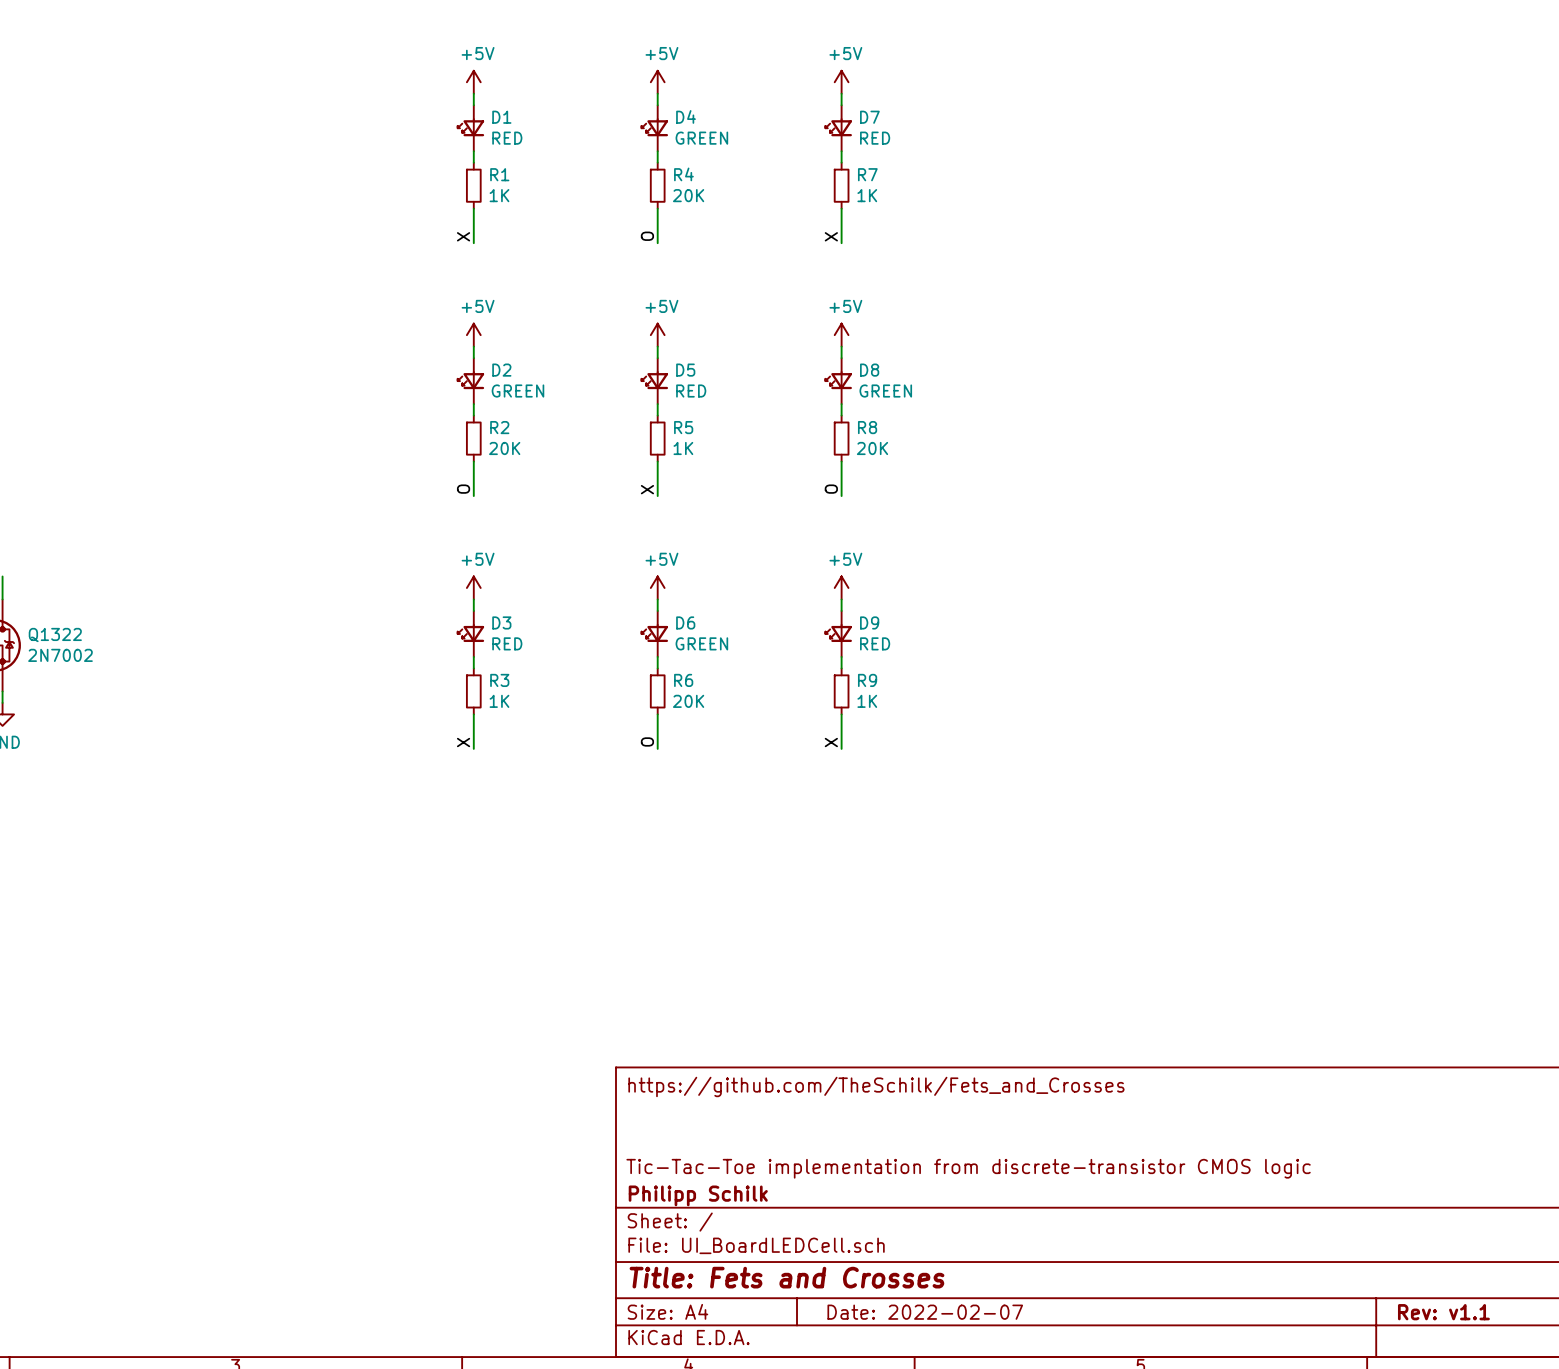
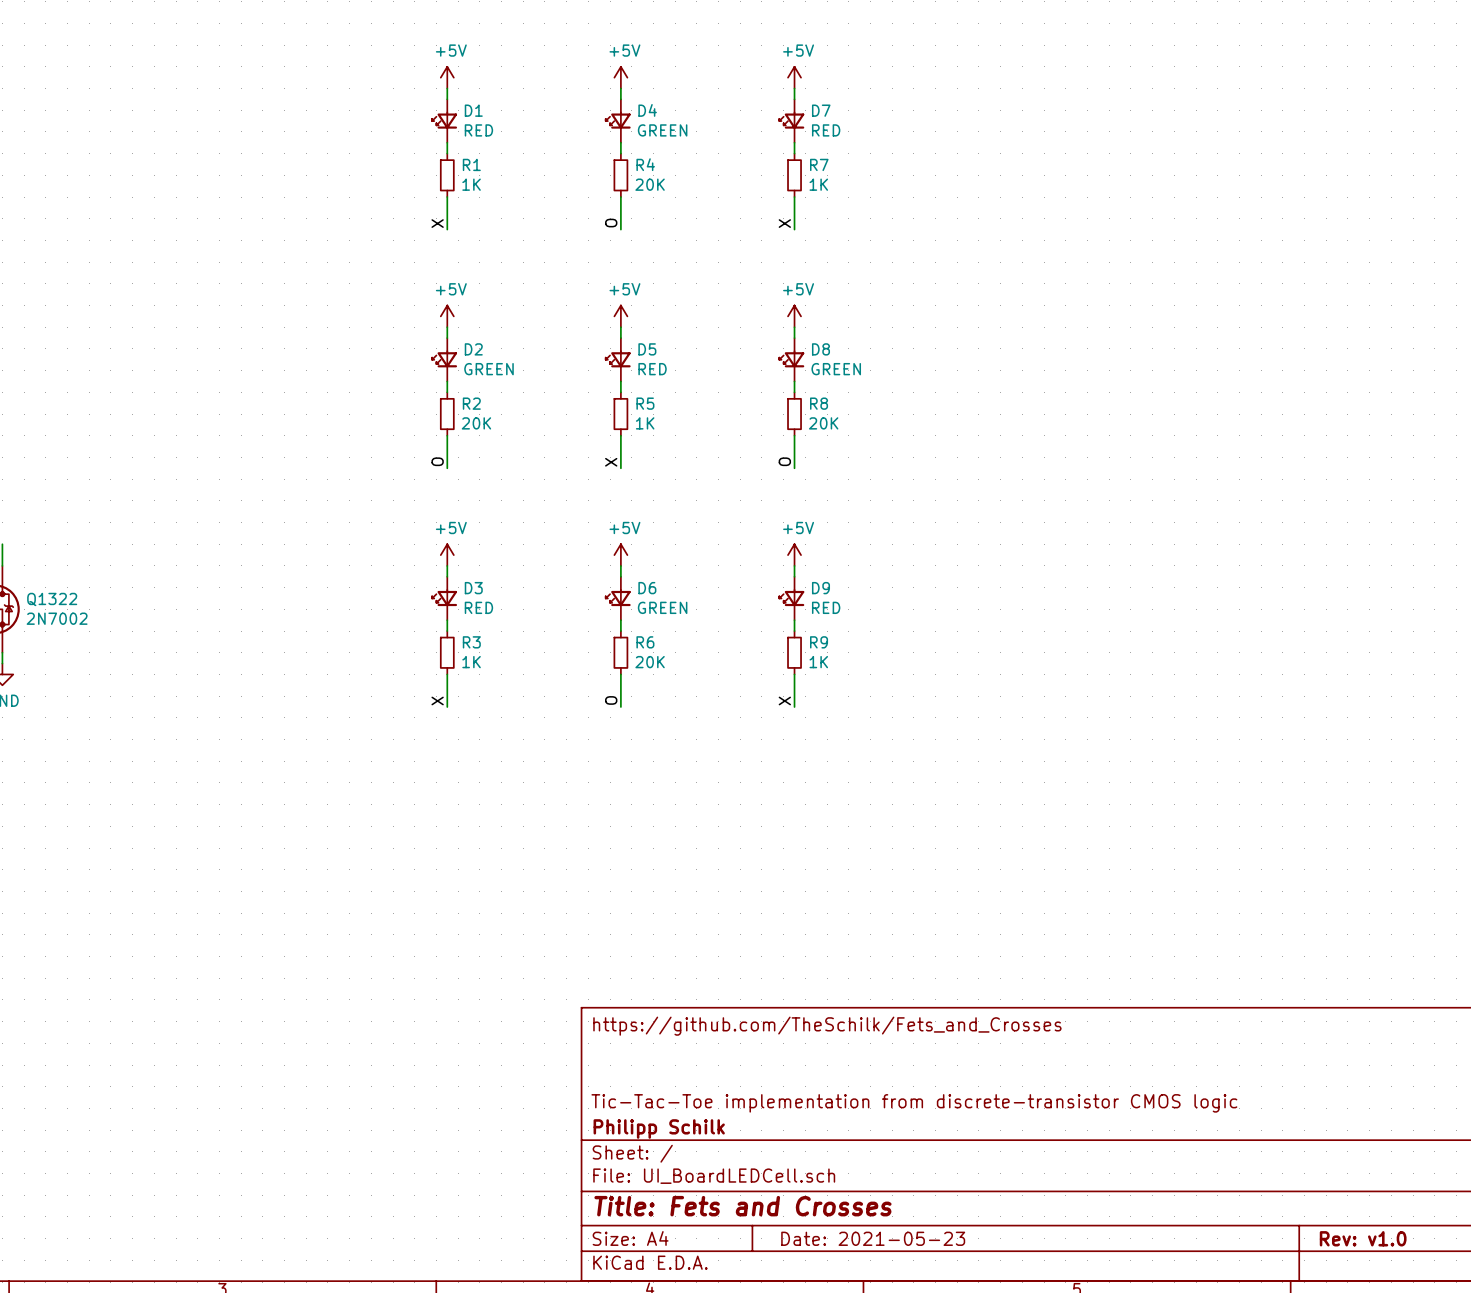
title block: Date: 2022-02-07 (925, 1312) -> Date: 2021-05-23 (873, 1238)
title block: Rev: v1.1 (1443, 1312) -> Rev: v1.0 (1363, 1238)

